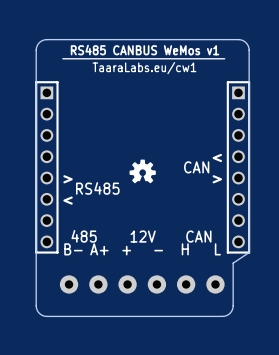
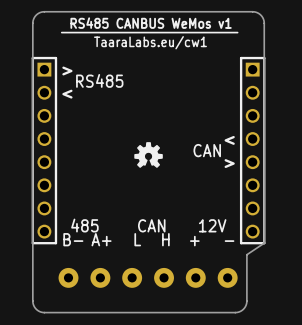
text position: > (68, 179) -> > (67, 70)
text position: RS485 (97, 188) -> RS485 (99, 80)
text position: < (68, 200) -> < (67, 94)
text: 12V (143, 236) -> CAN (151, 225)
text: CAN (198, 236) -> 12V (212, 225)
text: H (185, 249) -> + (194, 241)
text: L (217, 249) -> - (229, 241)
text: + (126, 250) -> L (137, 239)
text: - (158, 250) -> H (165, 239)

